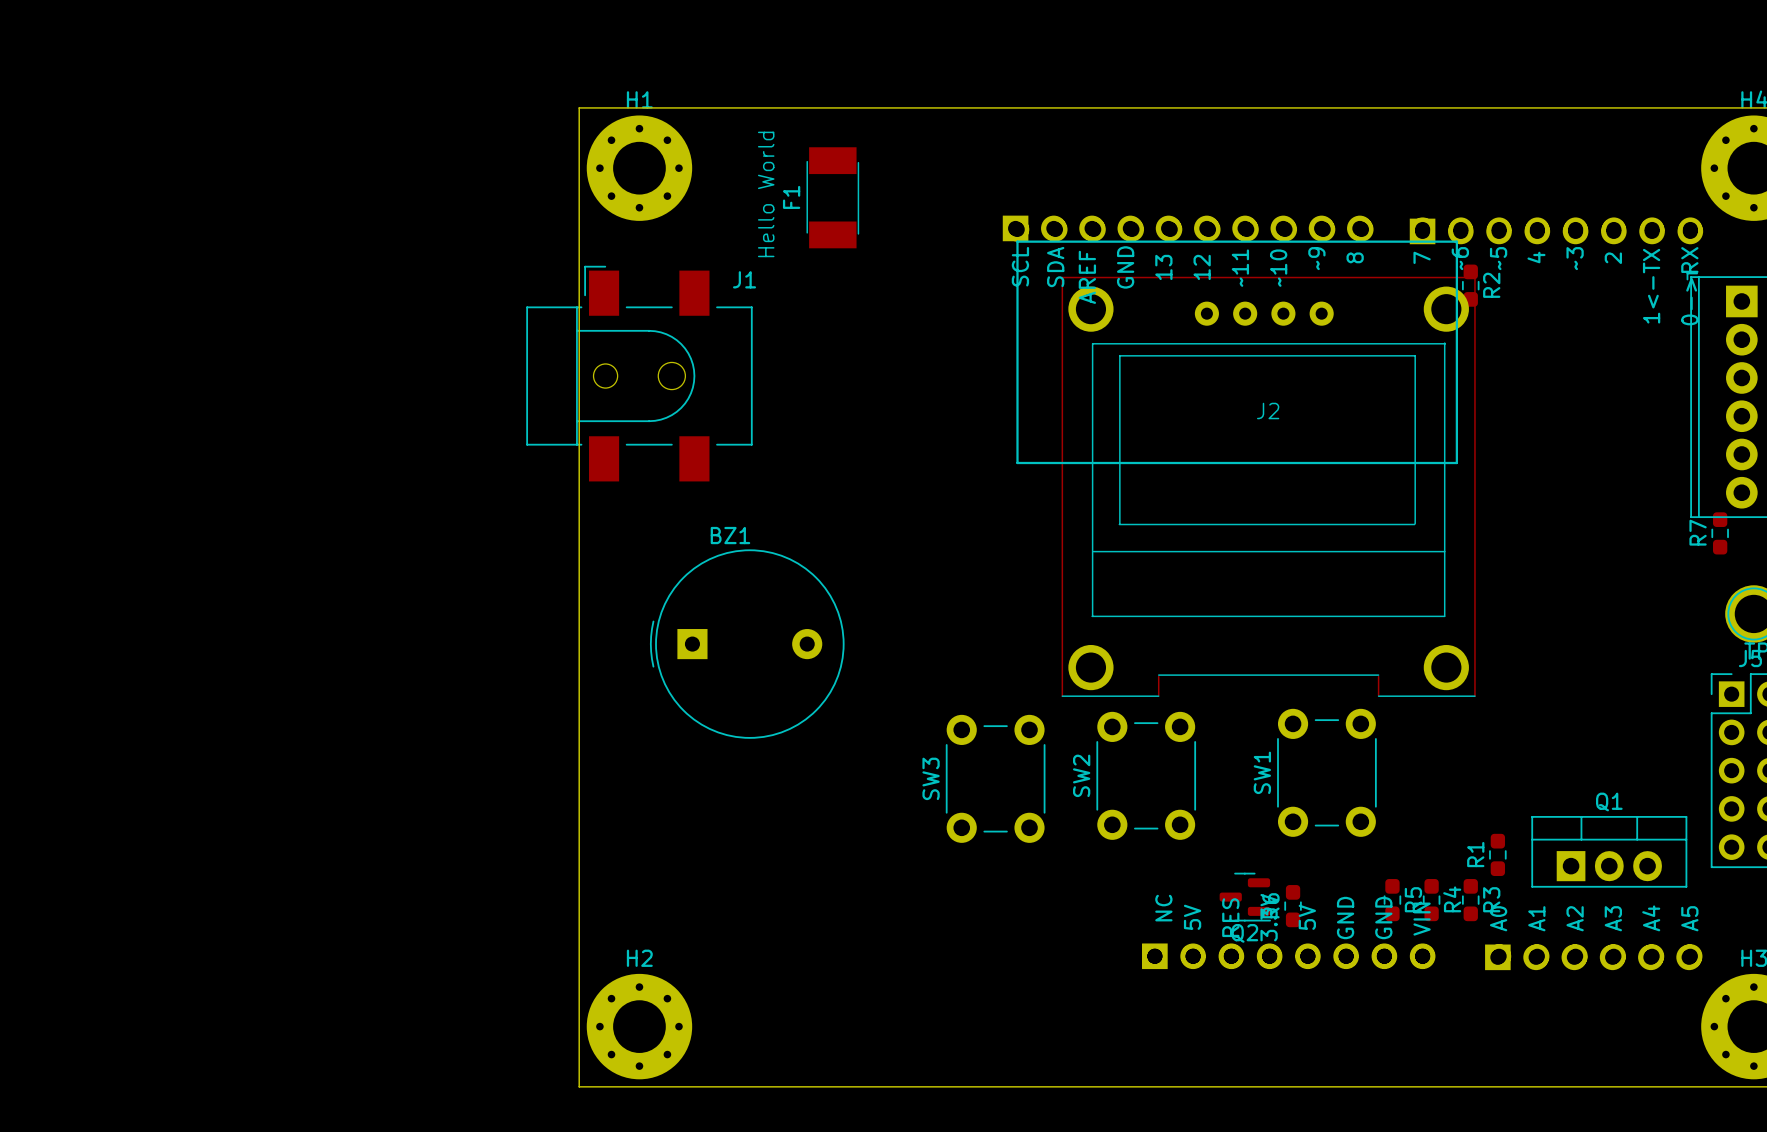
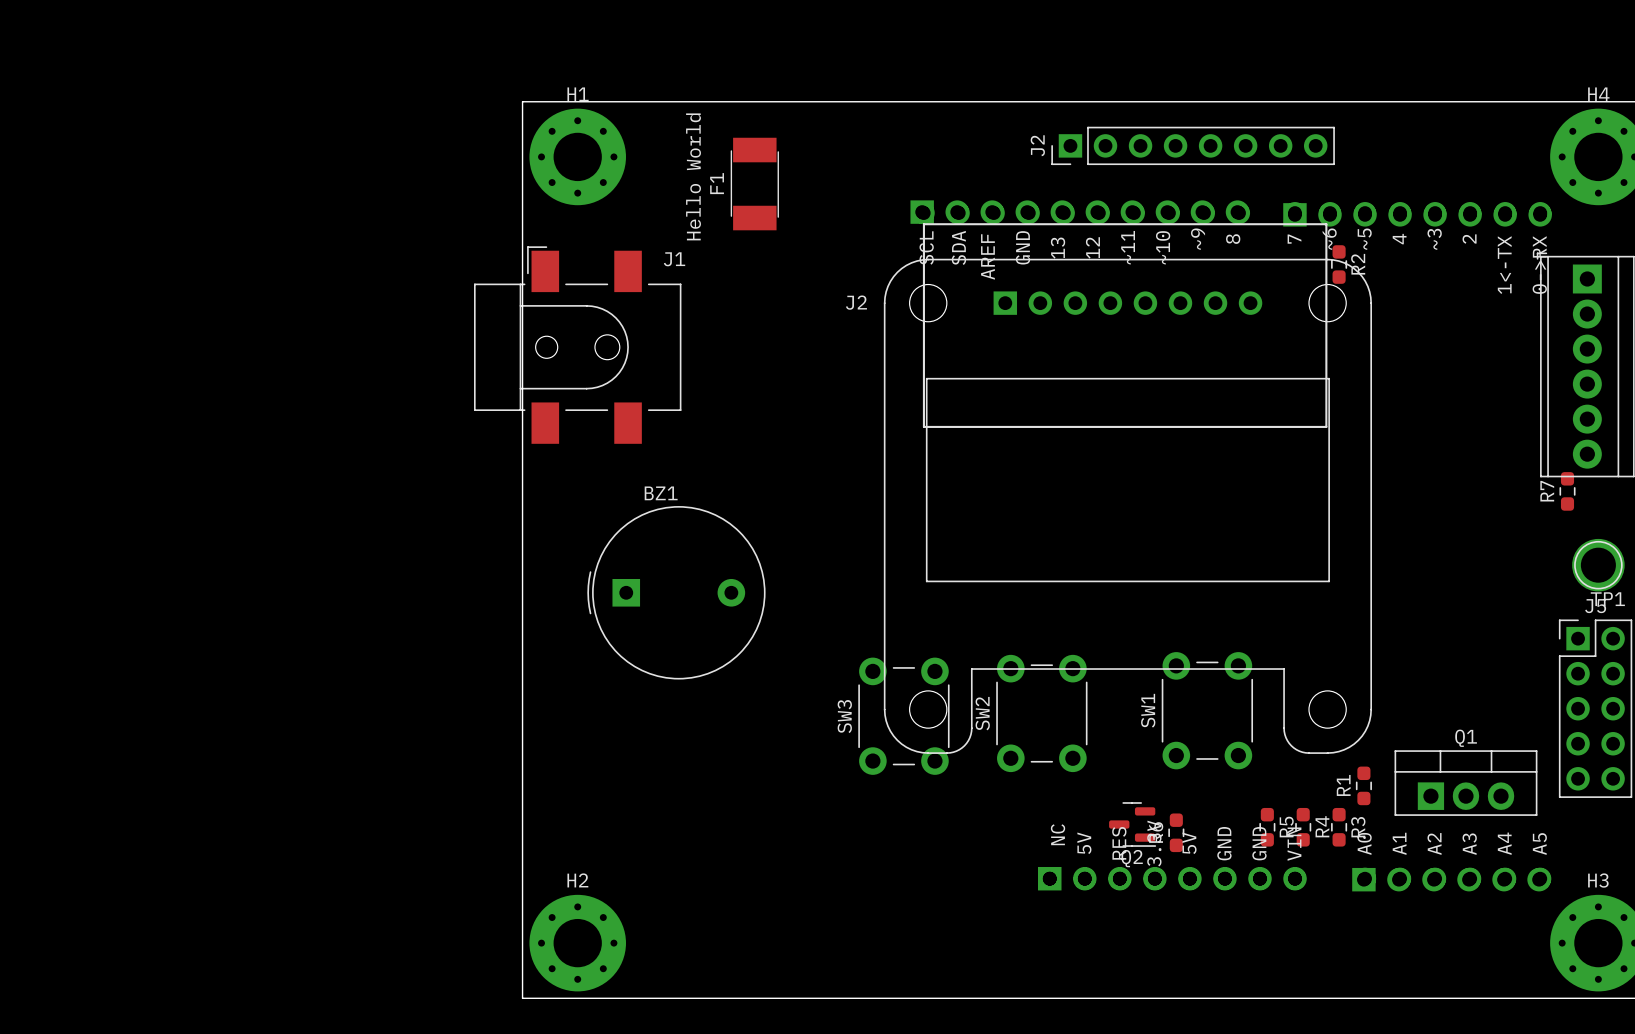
J2: none -> (1193, 145)
J2: (1268, 486) -> none
J2: none -> (1127, 506)

